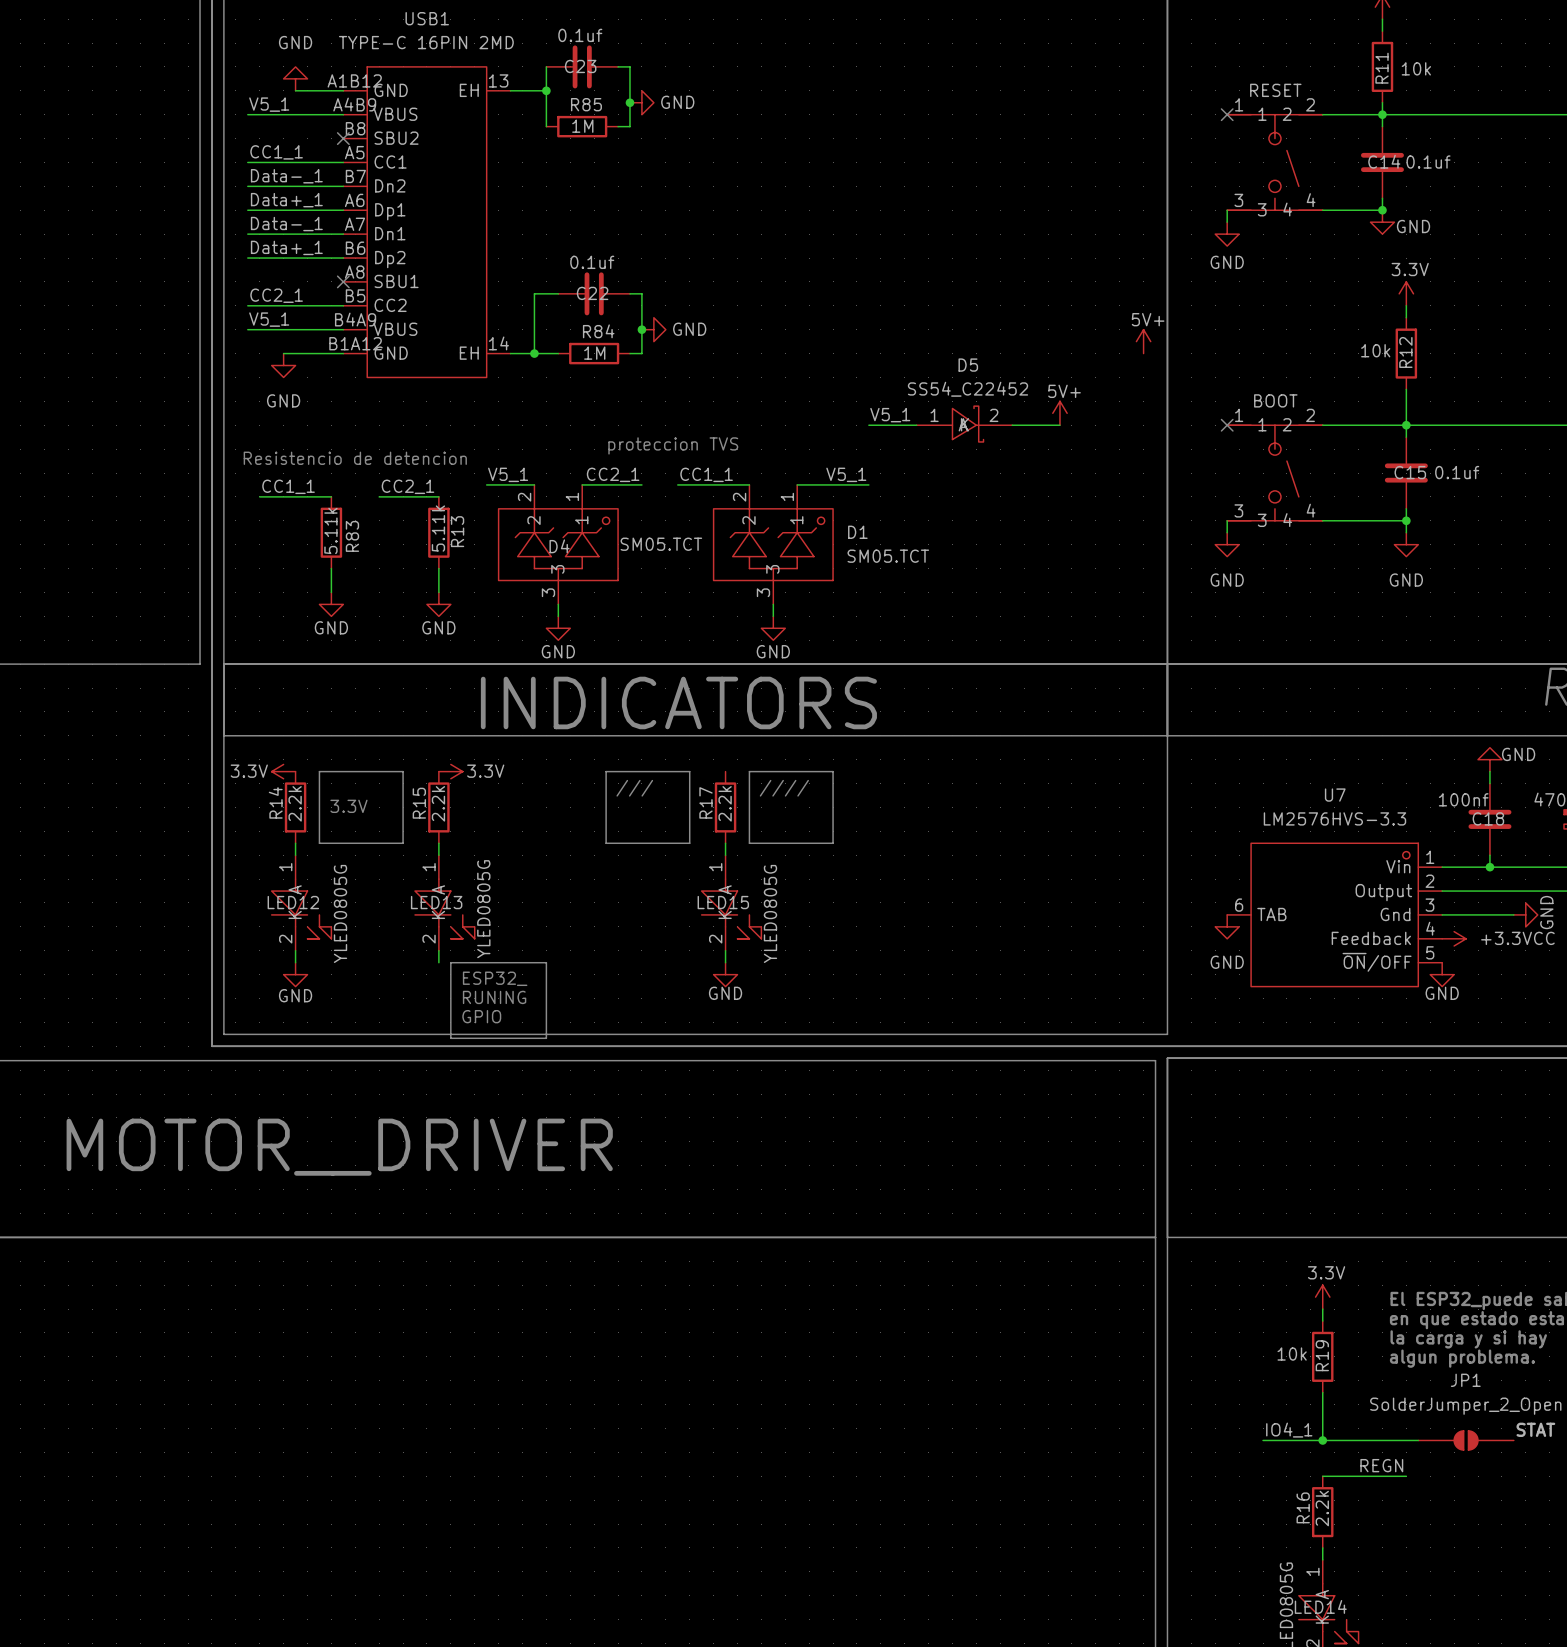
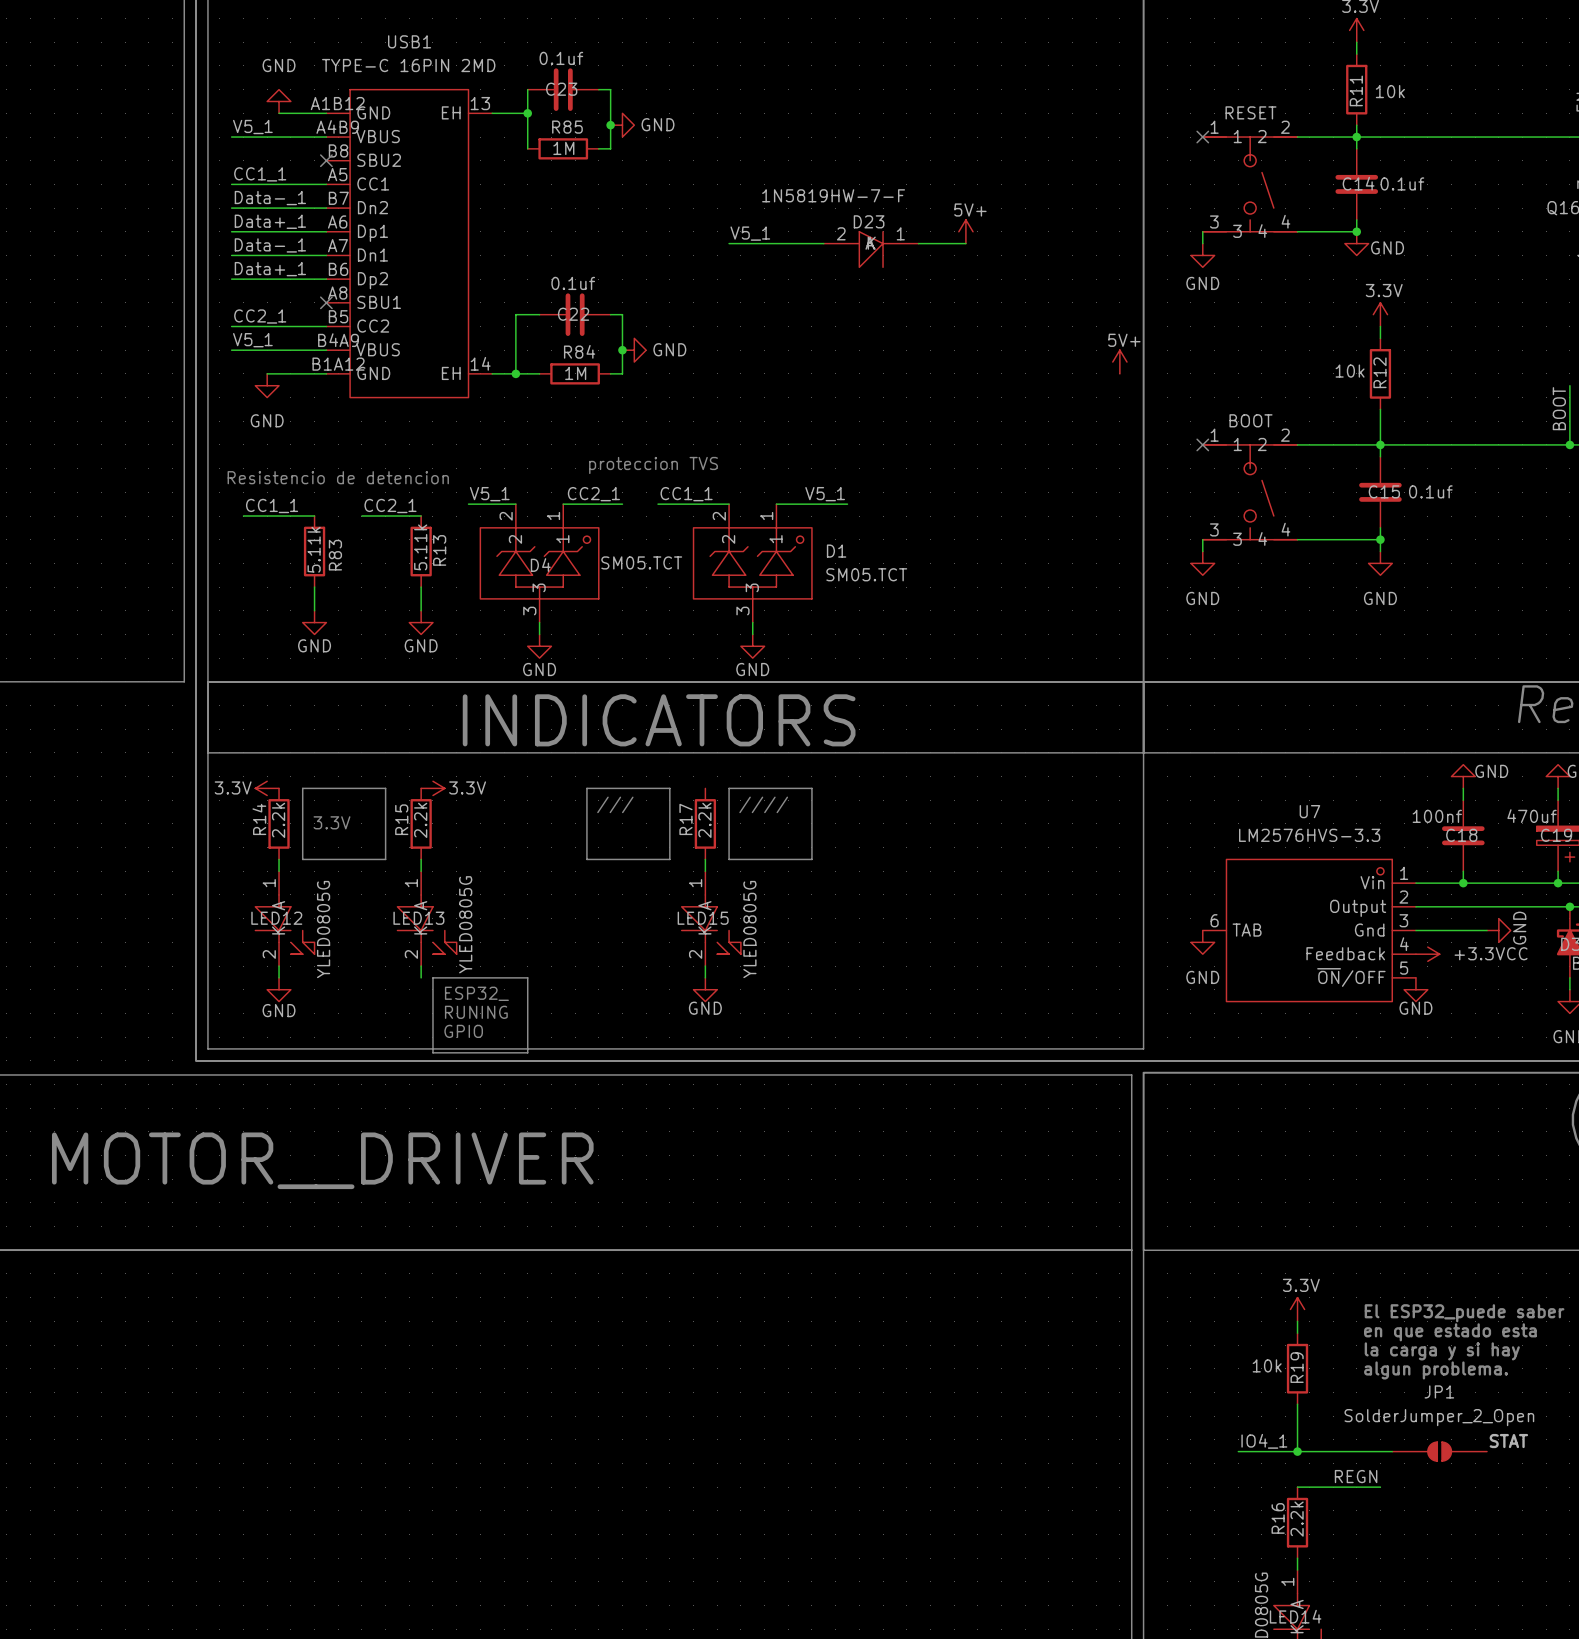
label: none -> V5_1 (750, 233)
wire: none -> (729, 243) (823, 243)
D23: none -> 1N5819HW-7-F (871, 249)
power symbol position: 5V+ (1059, 413) -> 5V+ (965, 231)
label: V5_1 (890, 415) -> none
D5: SS54_C22452 (964, 424) -> none
wire: (868, 425) (916, 425) -> (918, 243) (965, 243)
wire: (1012, 425) (1059, 425) -> none

